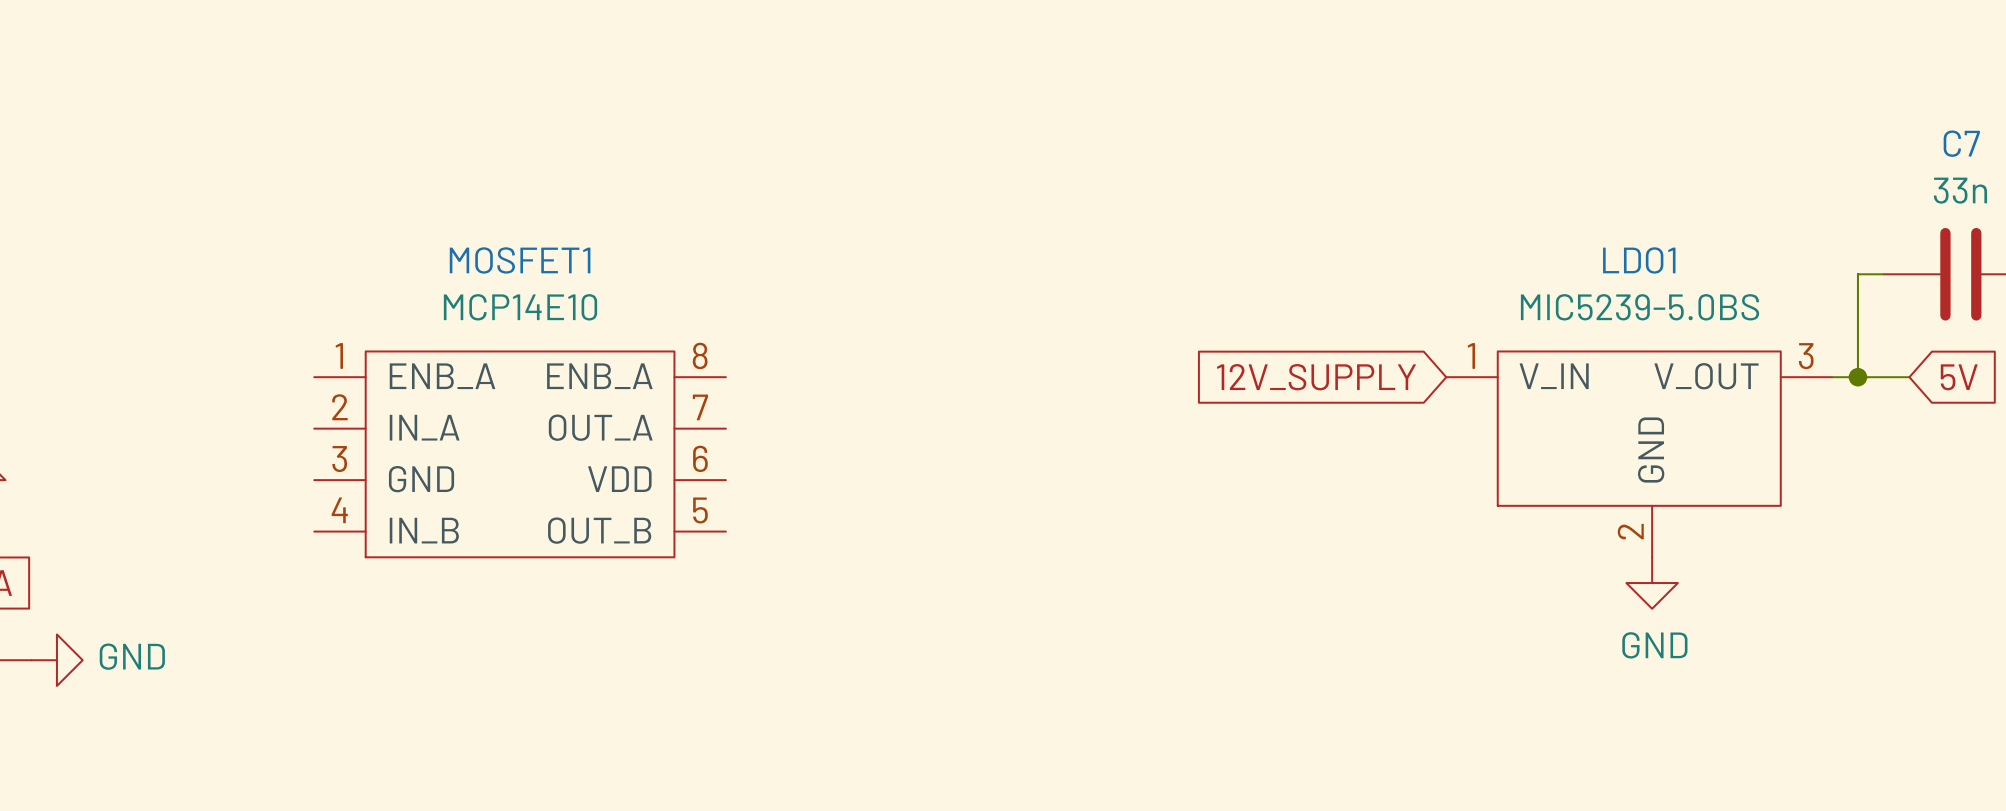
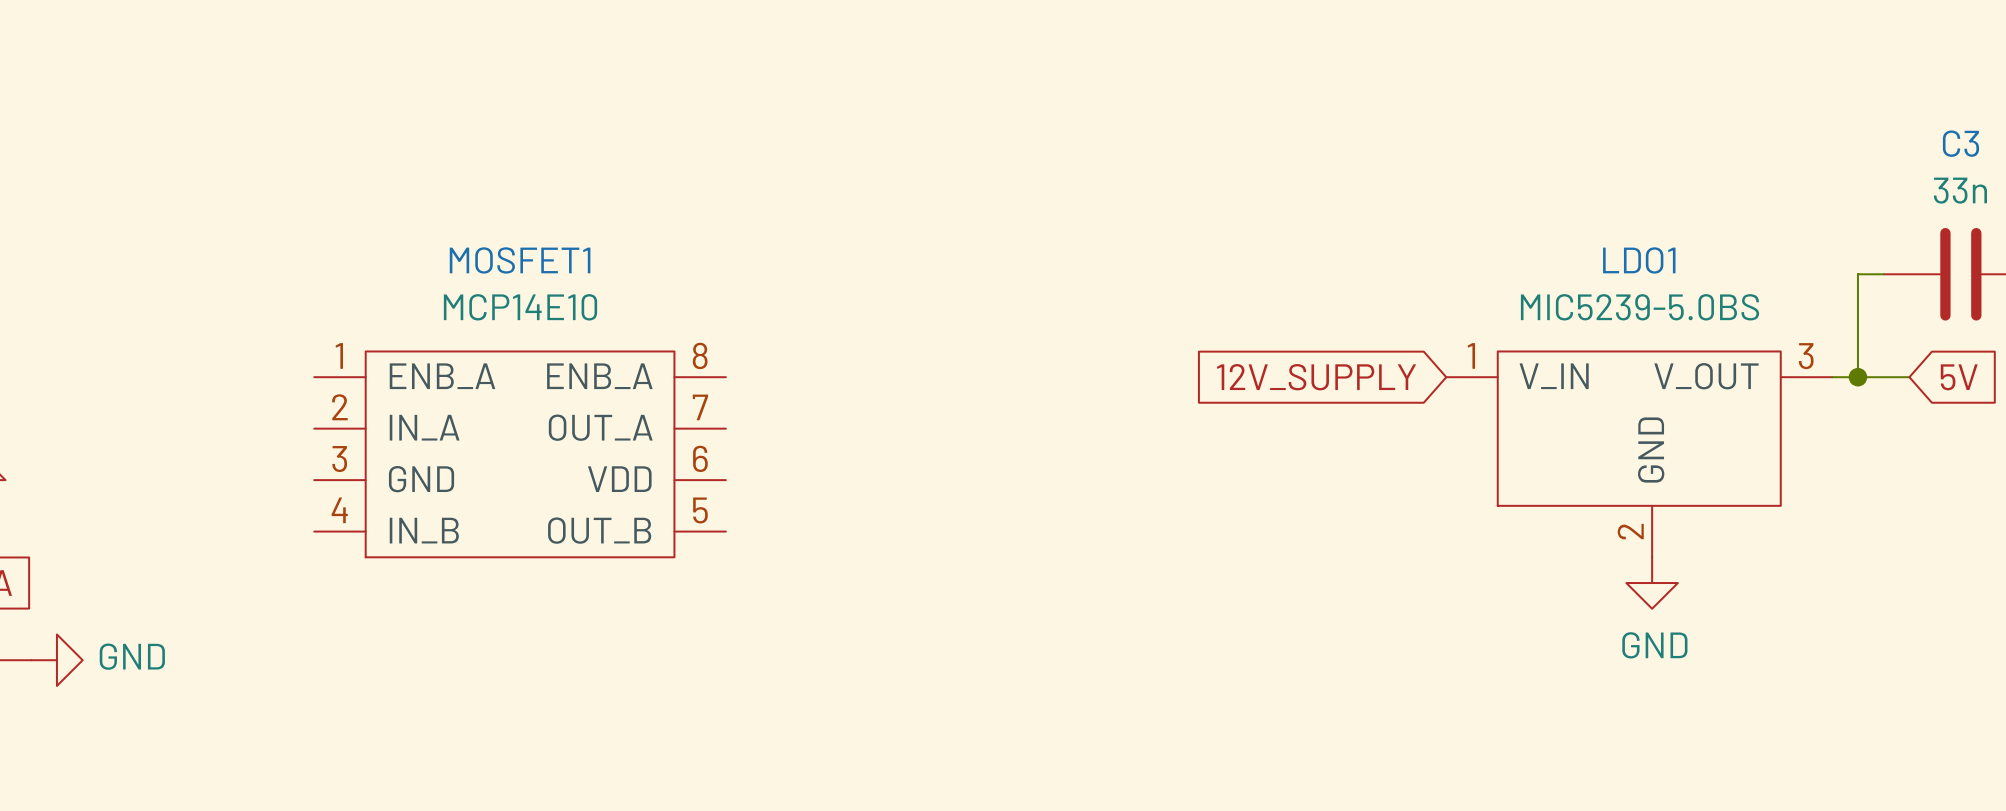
C7 name: C7 (1961, 143) -> C3 (1961, 143)

